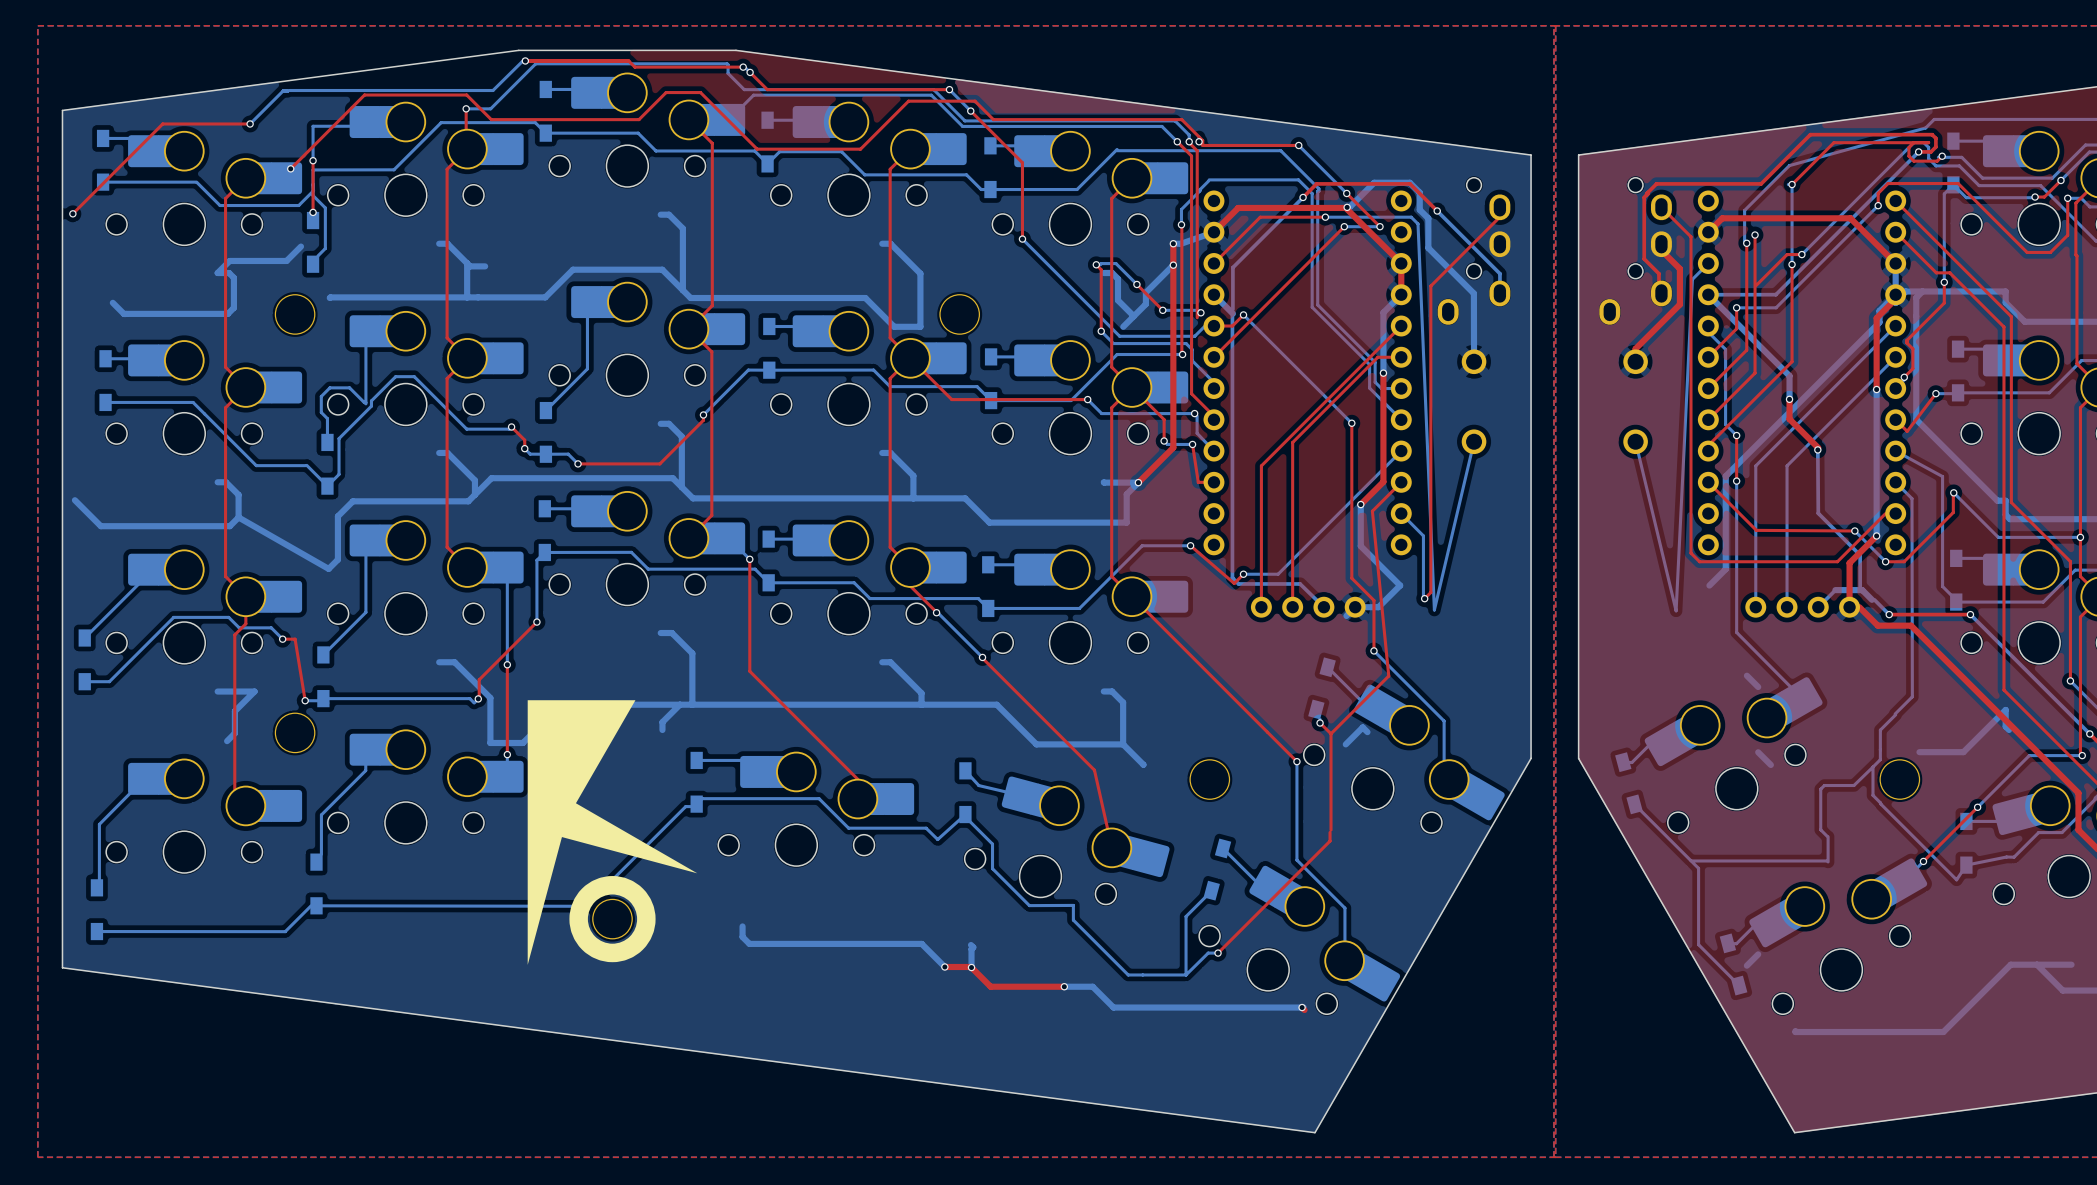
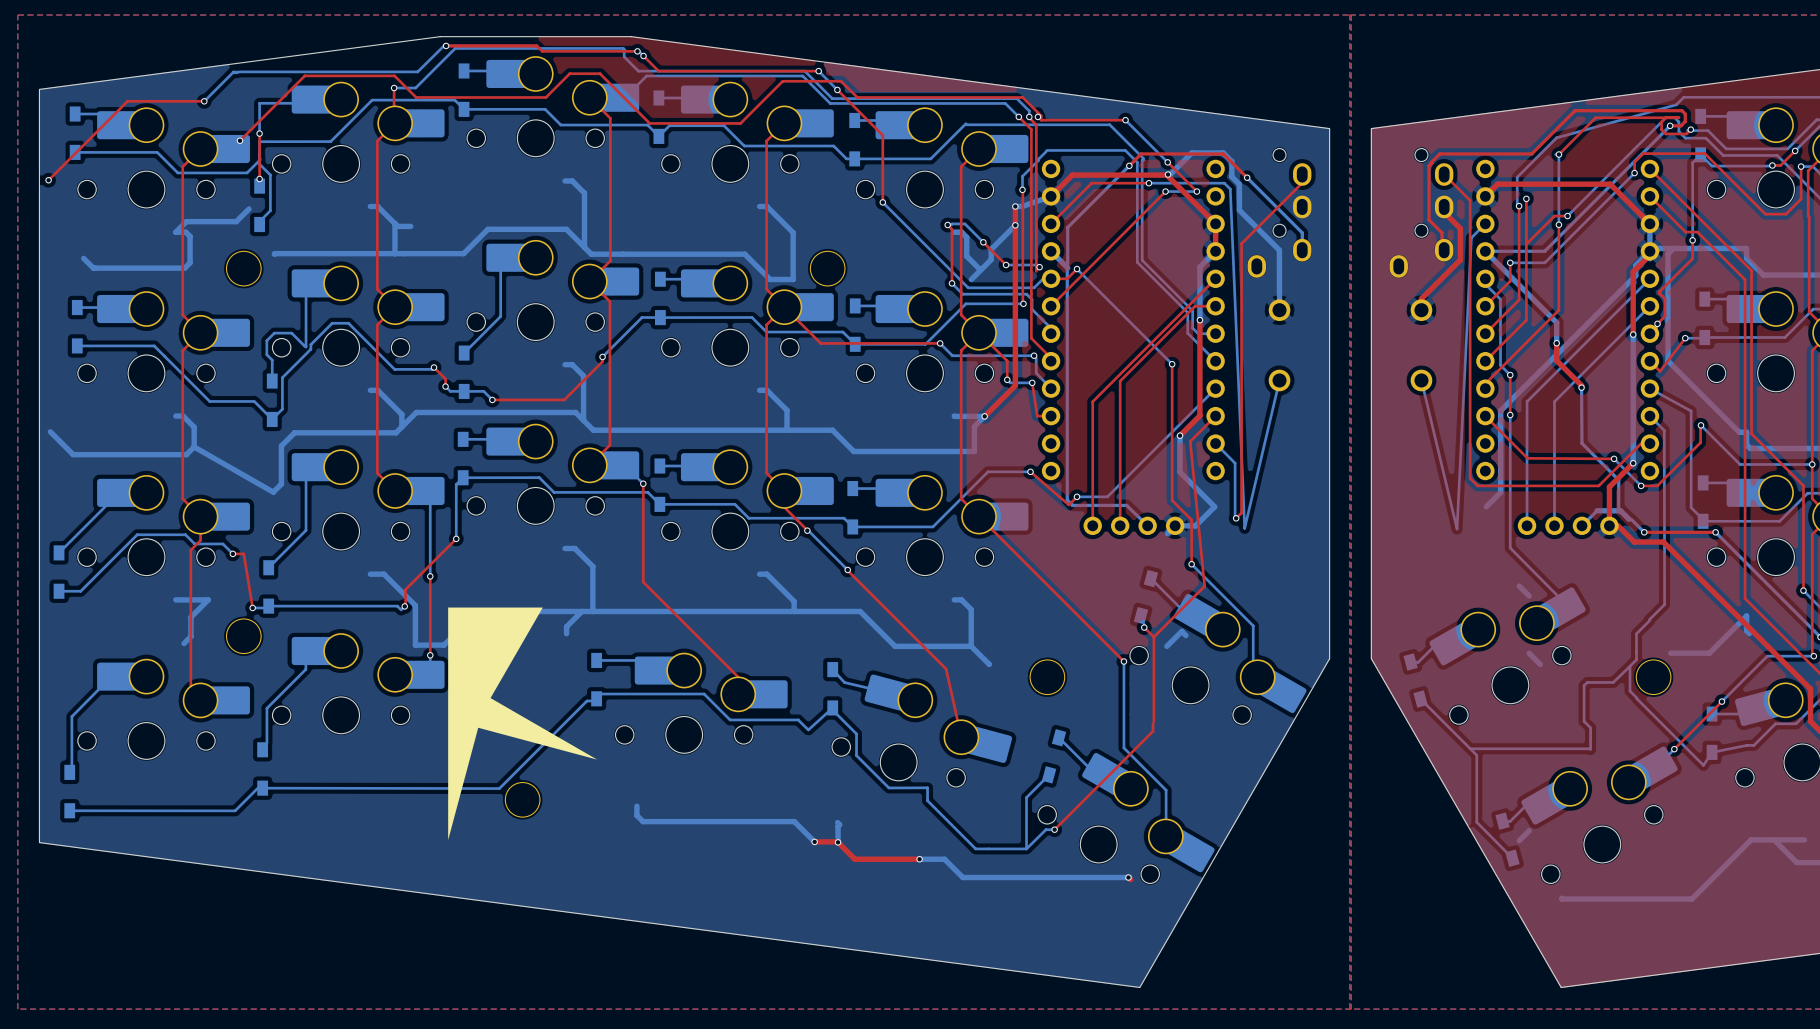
drawing: [569, 876, 656, 963] -> none

